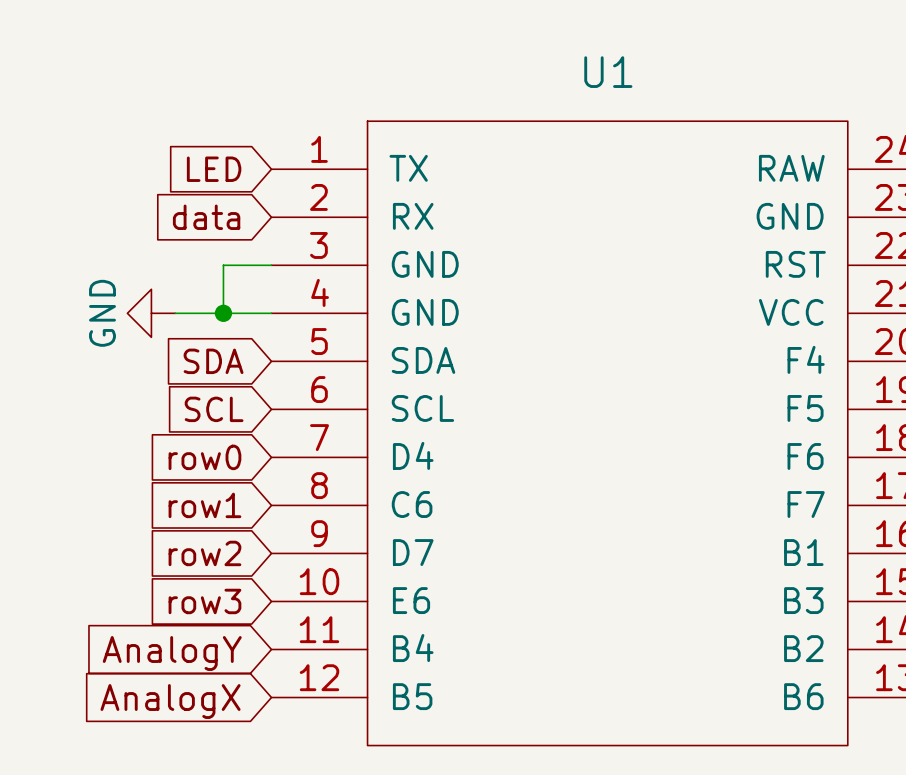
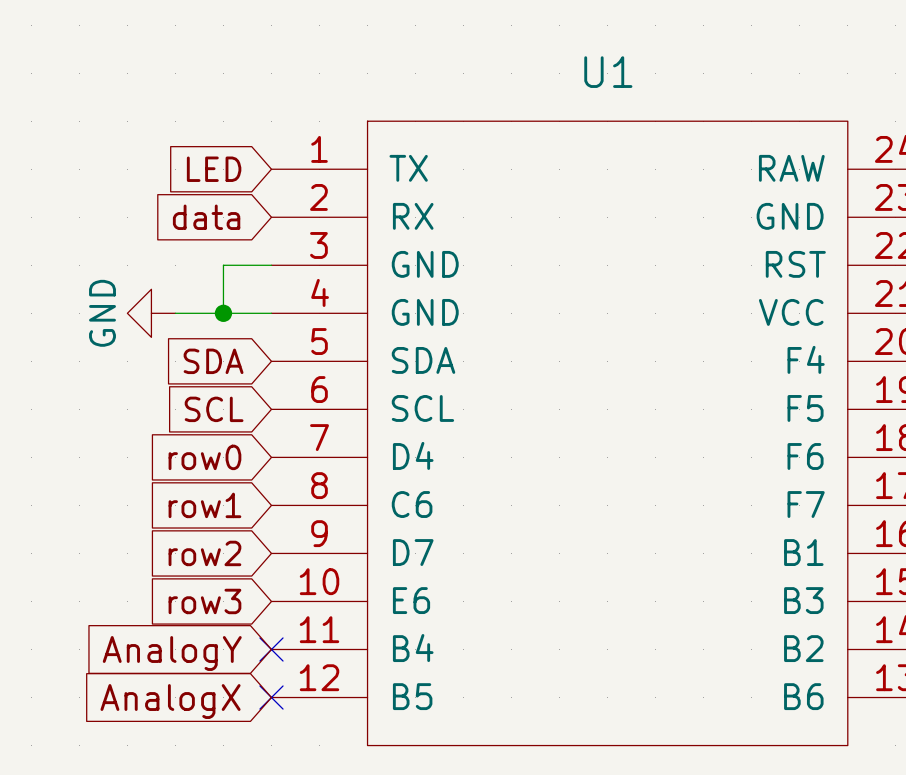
no-connect mark: none -> (271, 649)
no-connect mark: none -> (271, 697)

